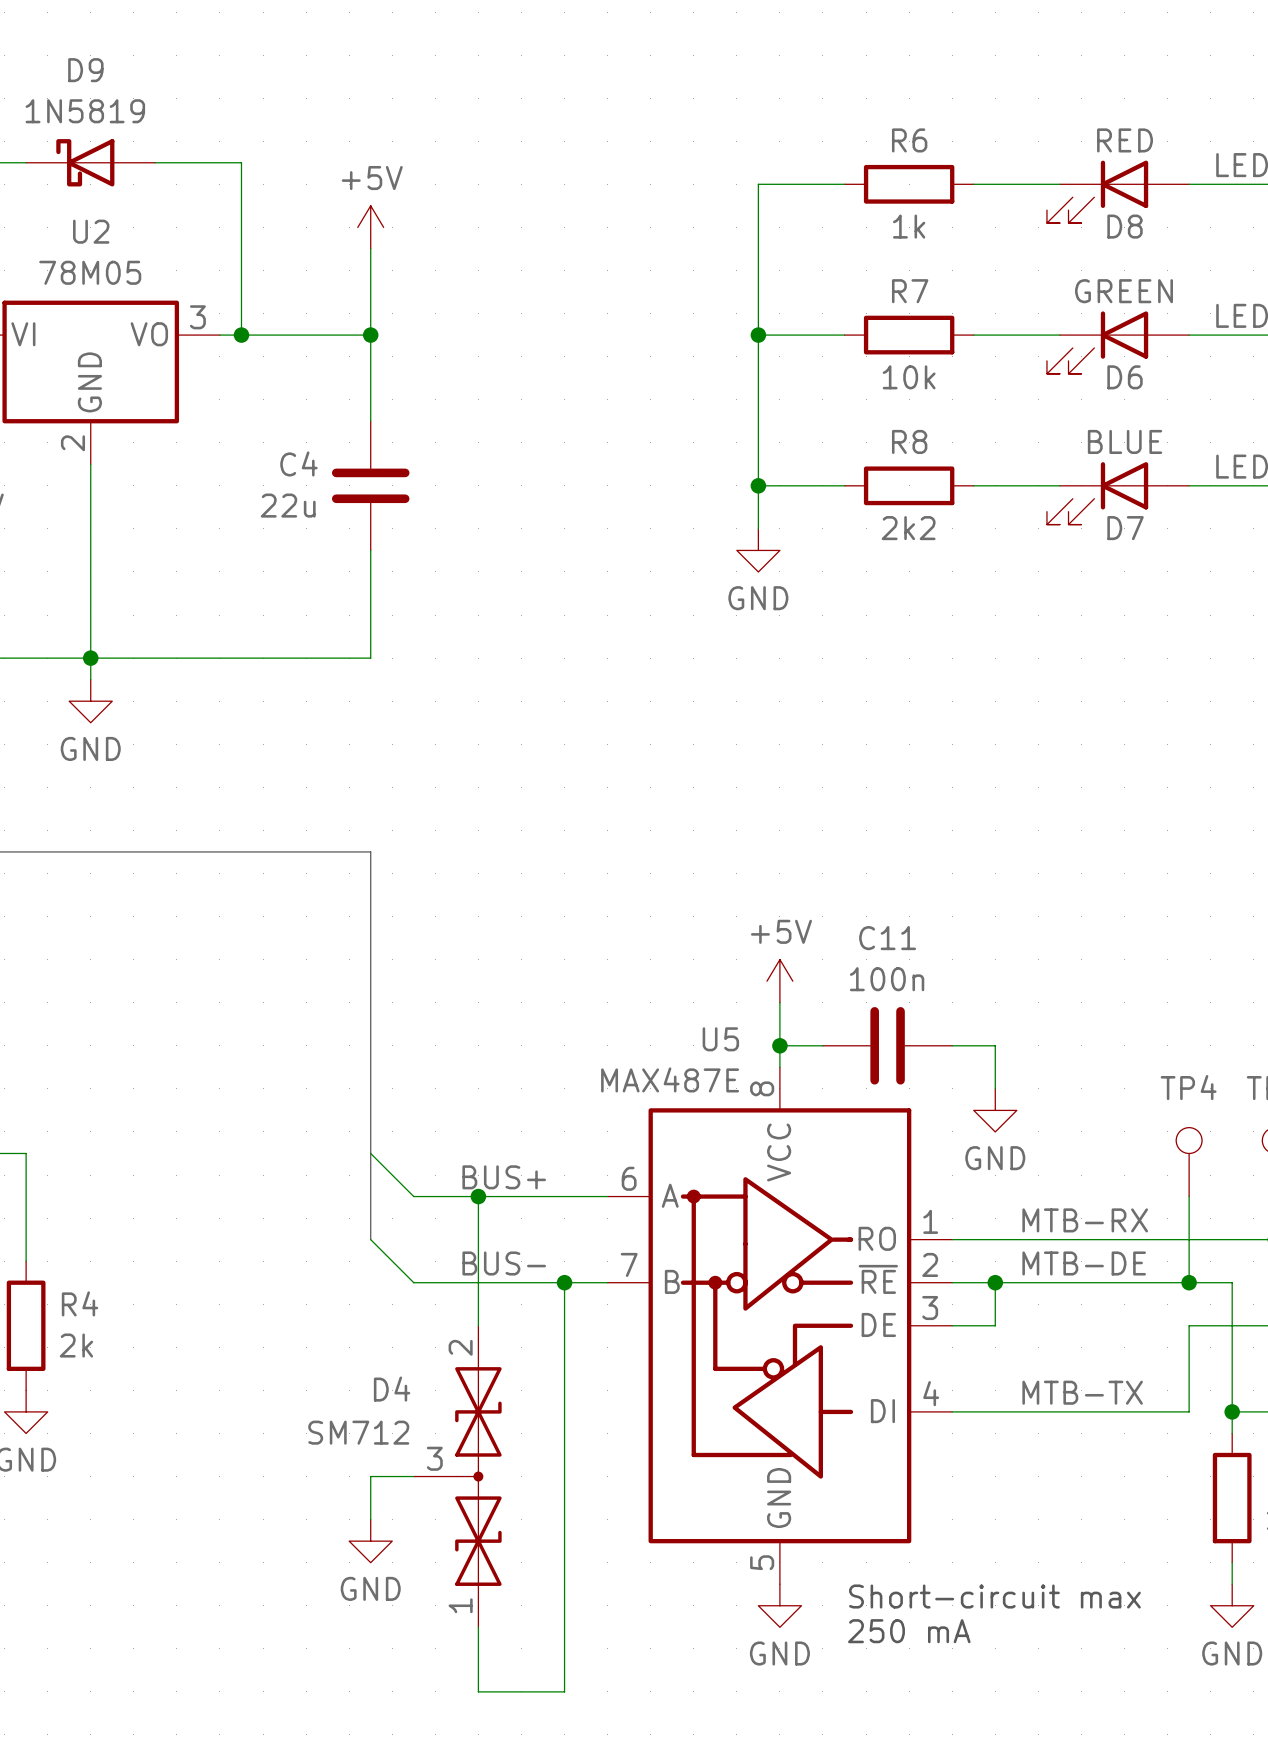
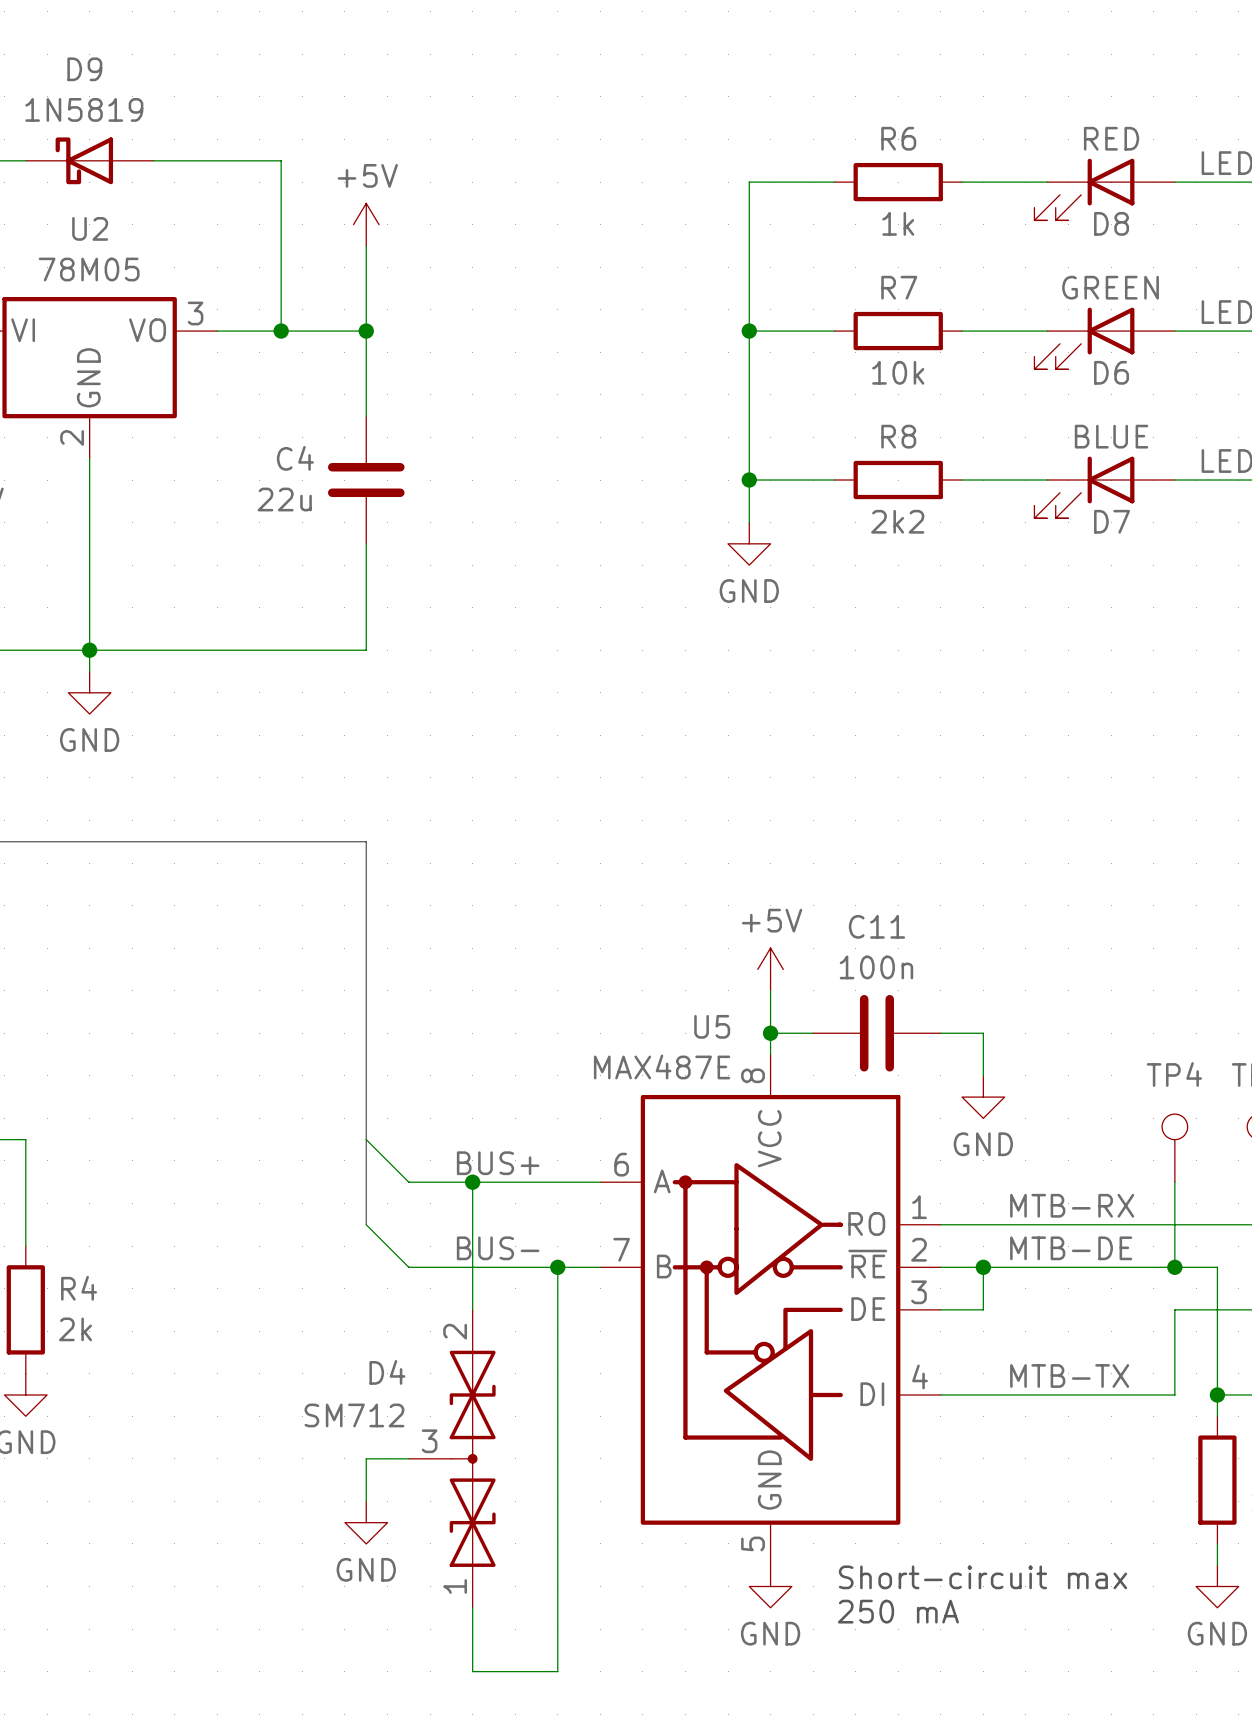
wire: (241, 162) (241, 335) -> (238, 160) (281, 160) (281, 331)
junction position: (241, 335) -> (281, 331)

